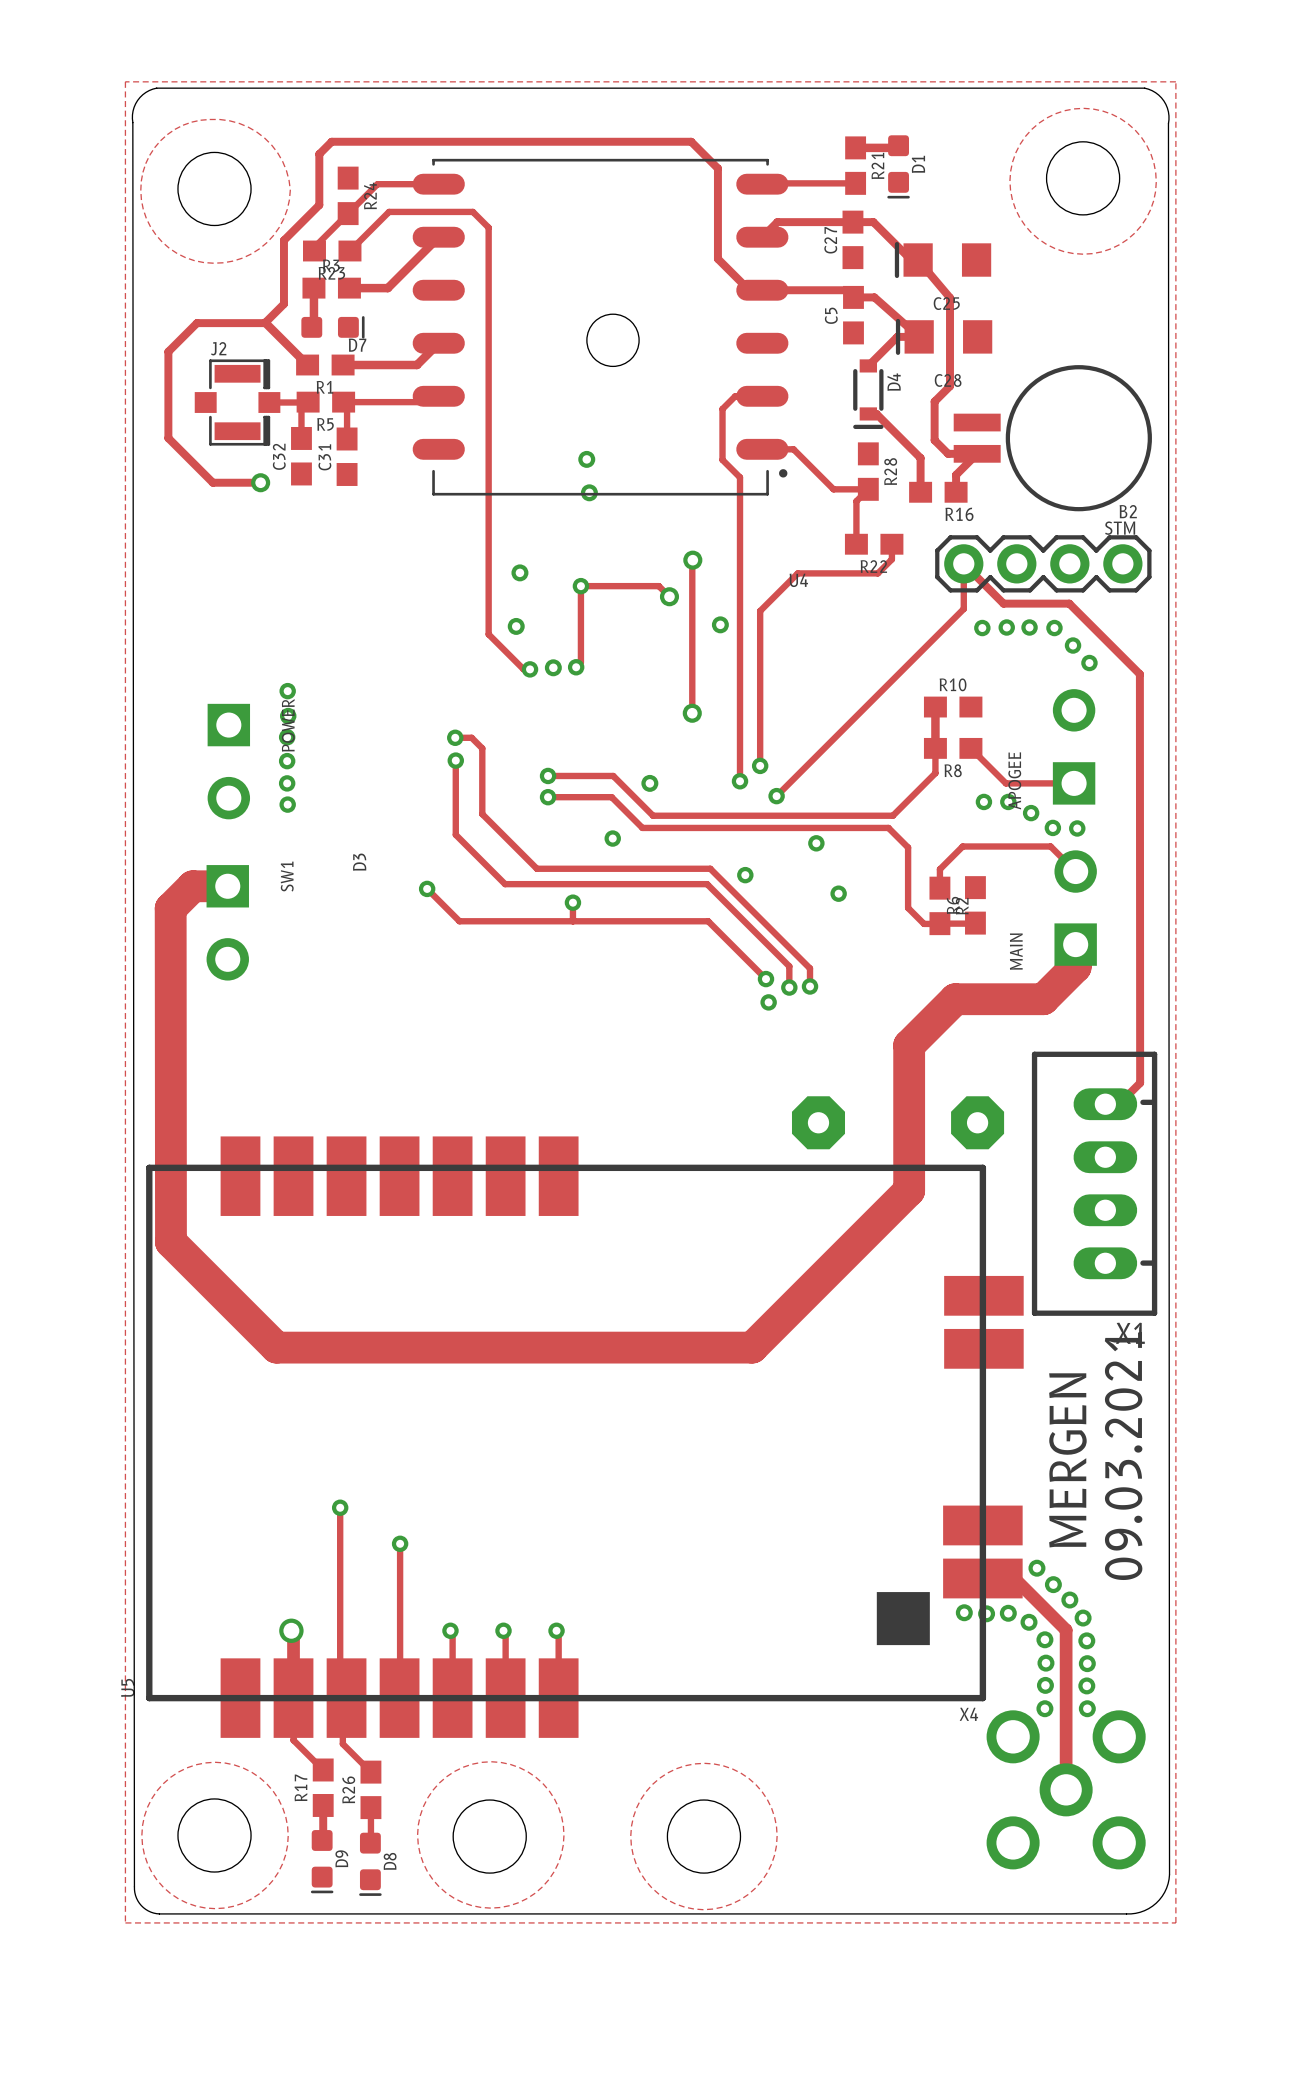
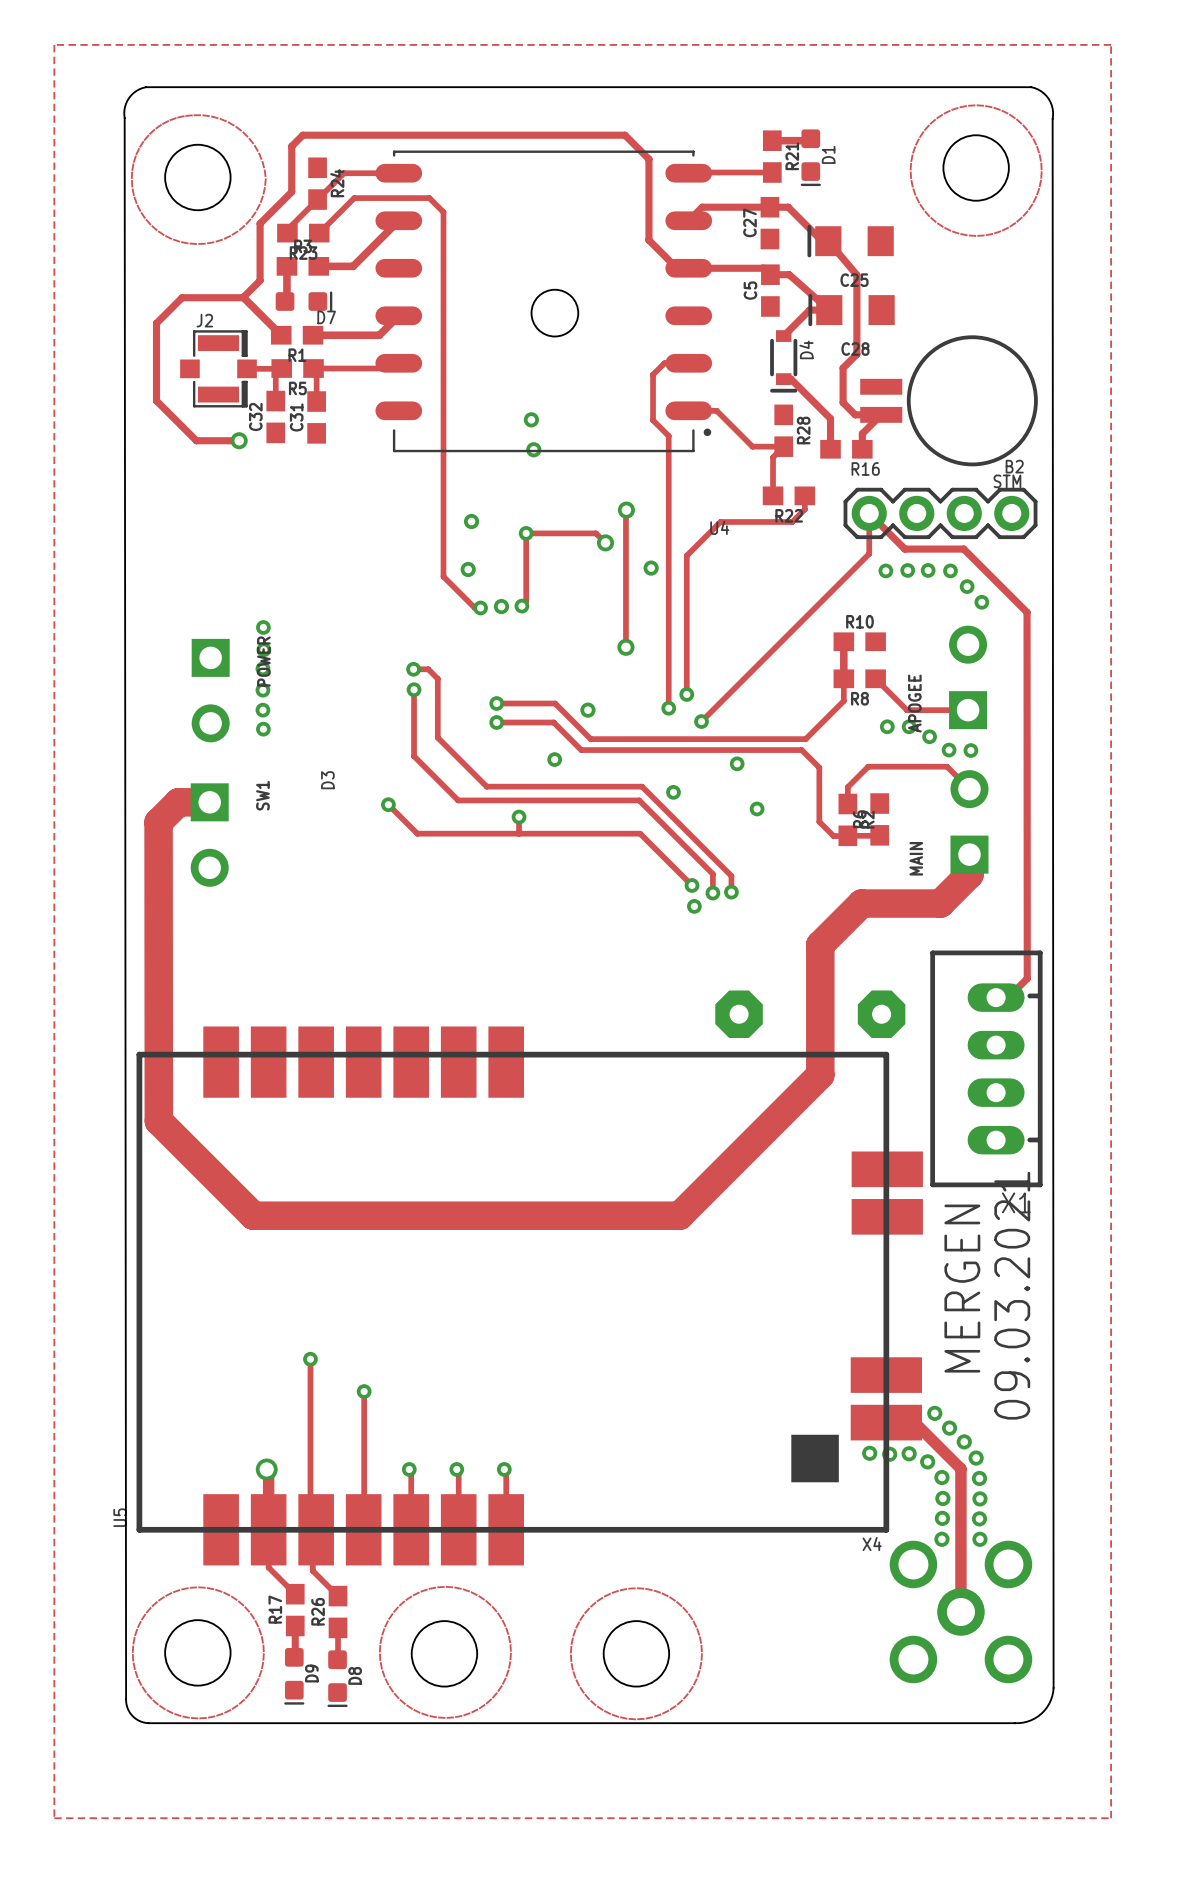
zone outline: (125, 81) (125, 1922) (1175, 1922) (1175, 81) (125, 81) -> (54, 44) (54, 1818) (1111, 1818) (1111, 44) (54, 44)

